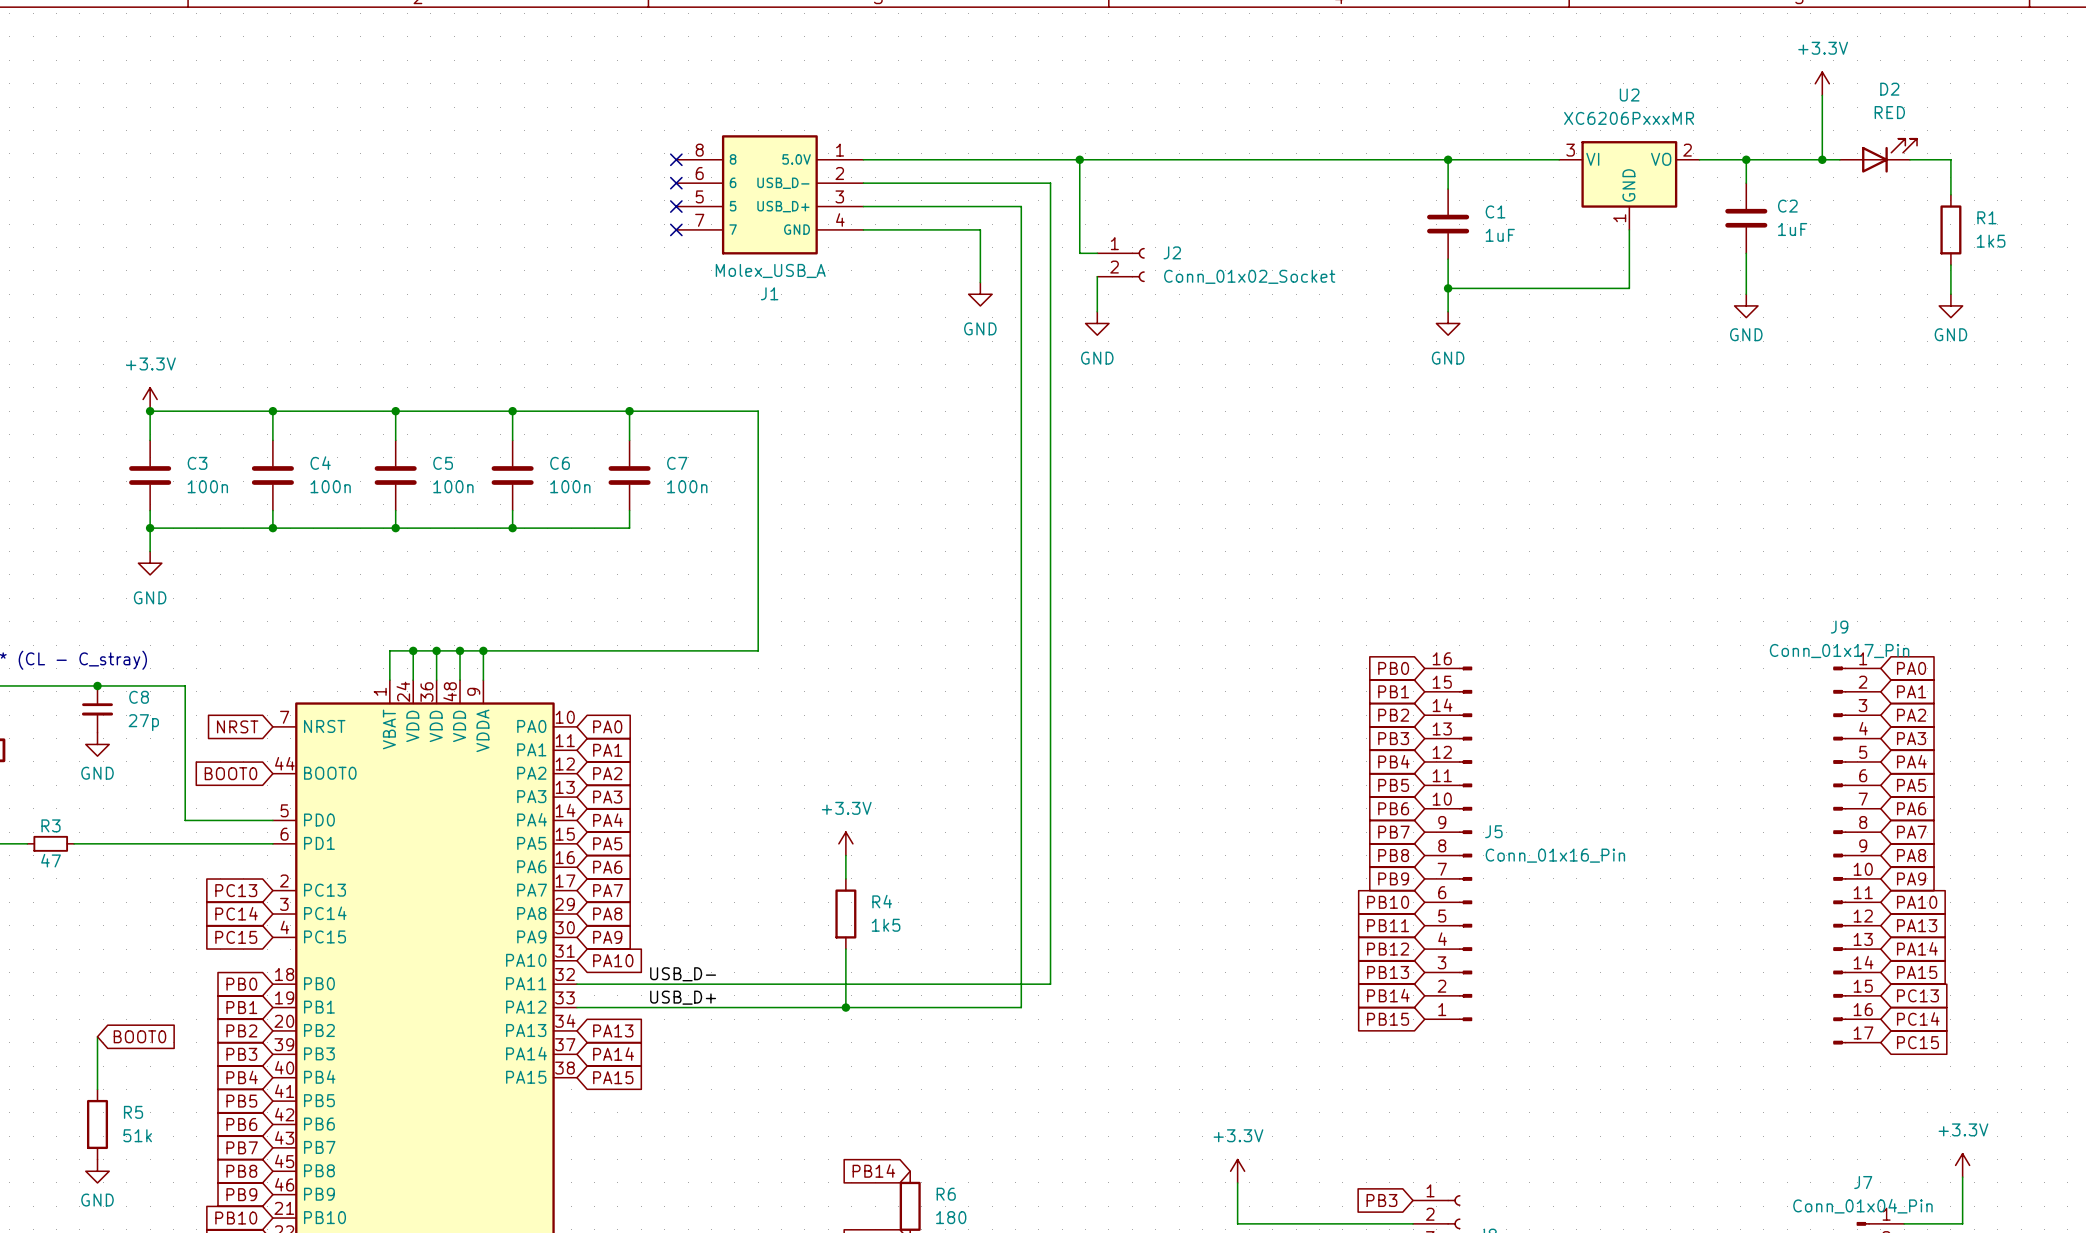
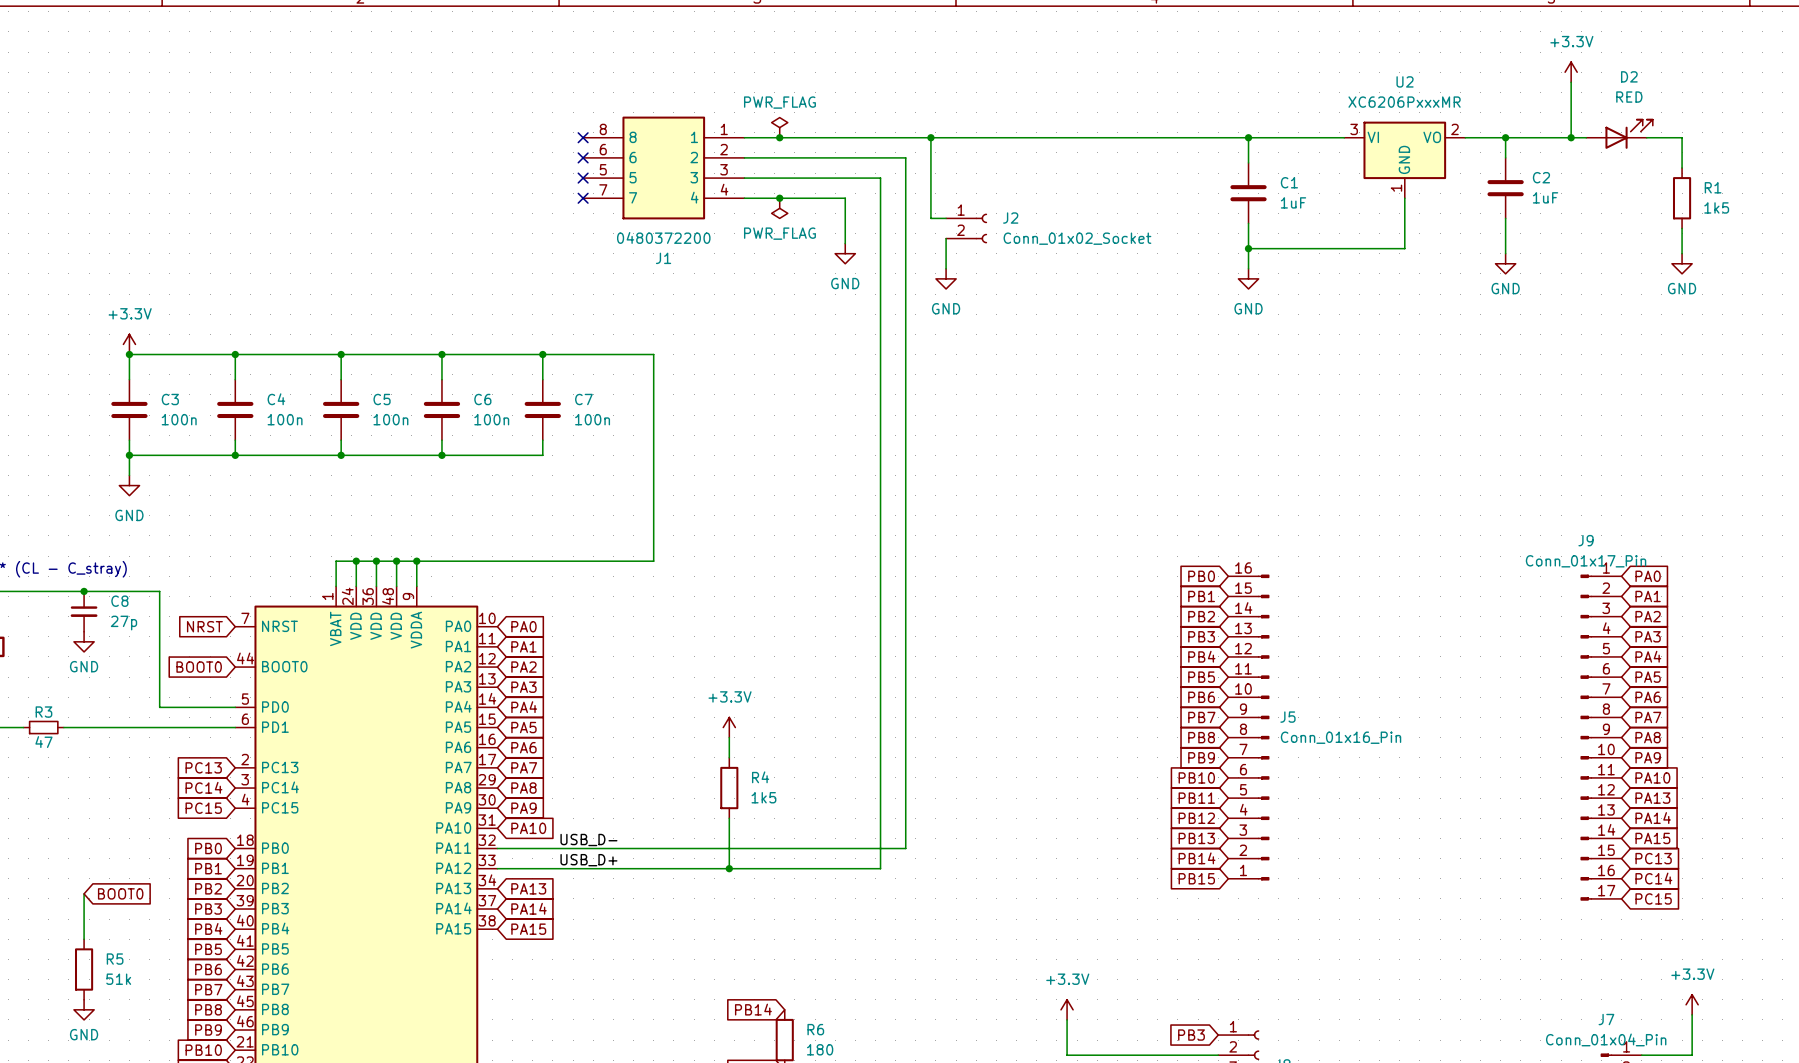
J1 symbol: [676, 135, 864, 255] -> [583, 116, 745, 220]
power symbol: none -> PWR_FLAG (779, 127)
junction: none -> (779, 137)
junction: none -> (779, 198)
power symbol: none -> PWR_FLAG (779, 208)
J1 value: Molex_USB_A (770, 270) -> 0480372200 (663, 237)

